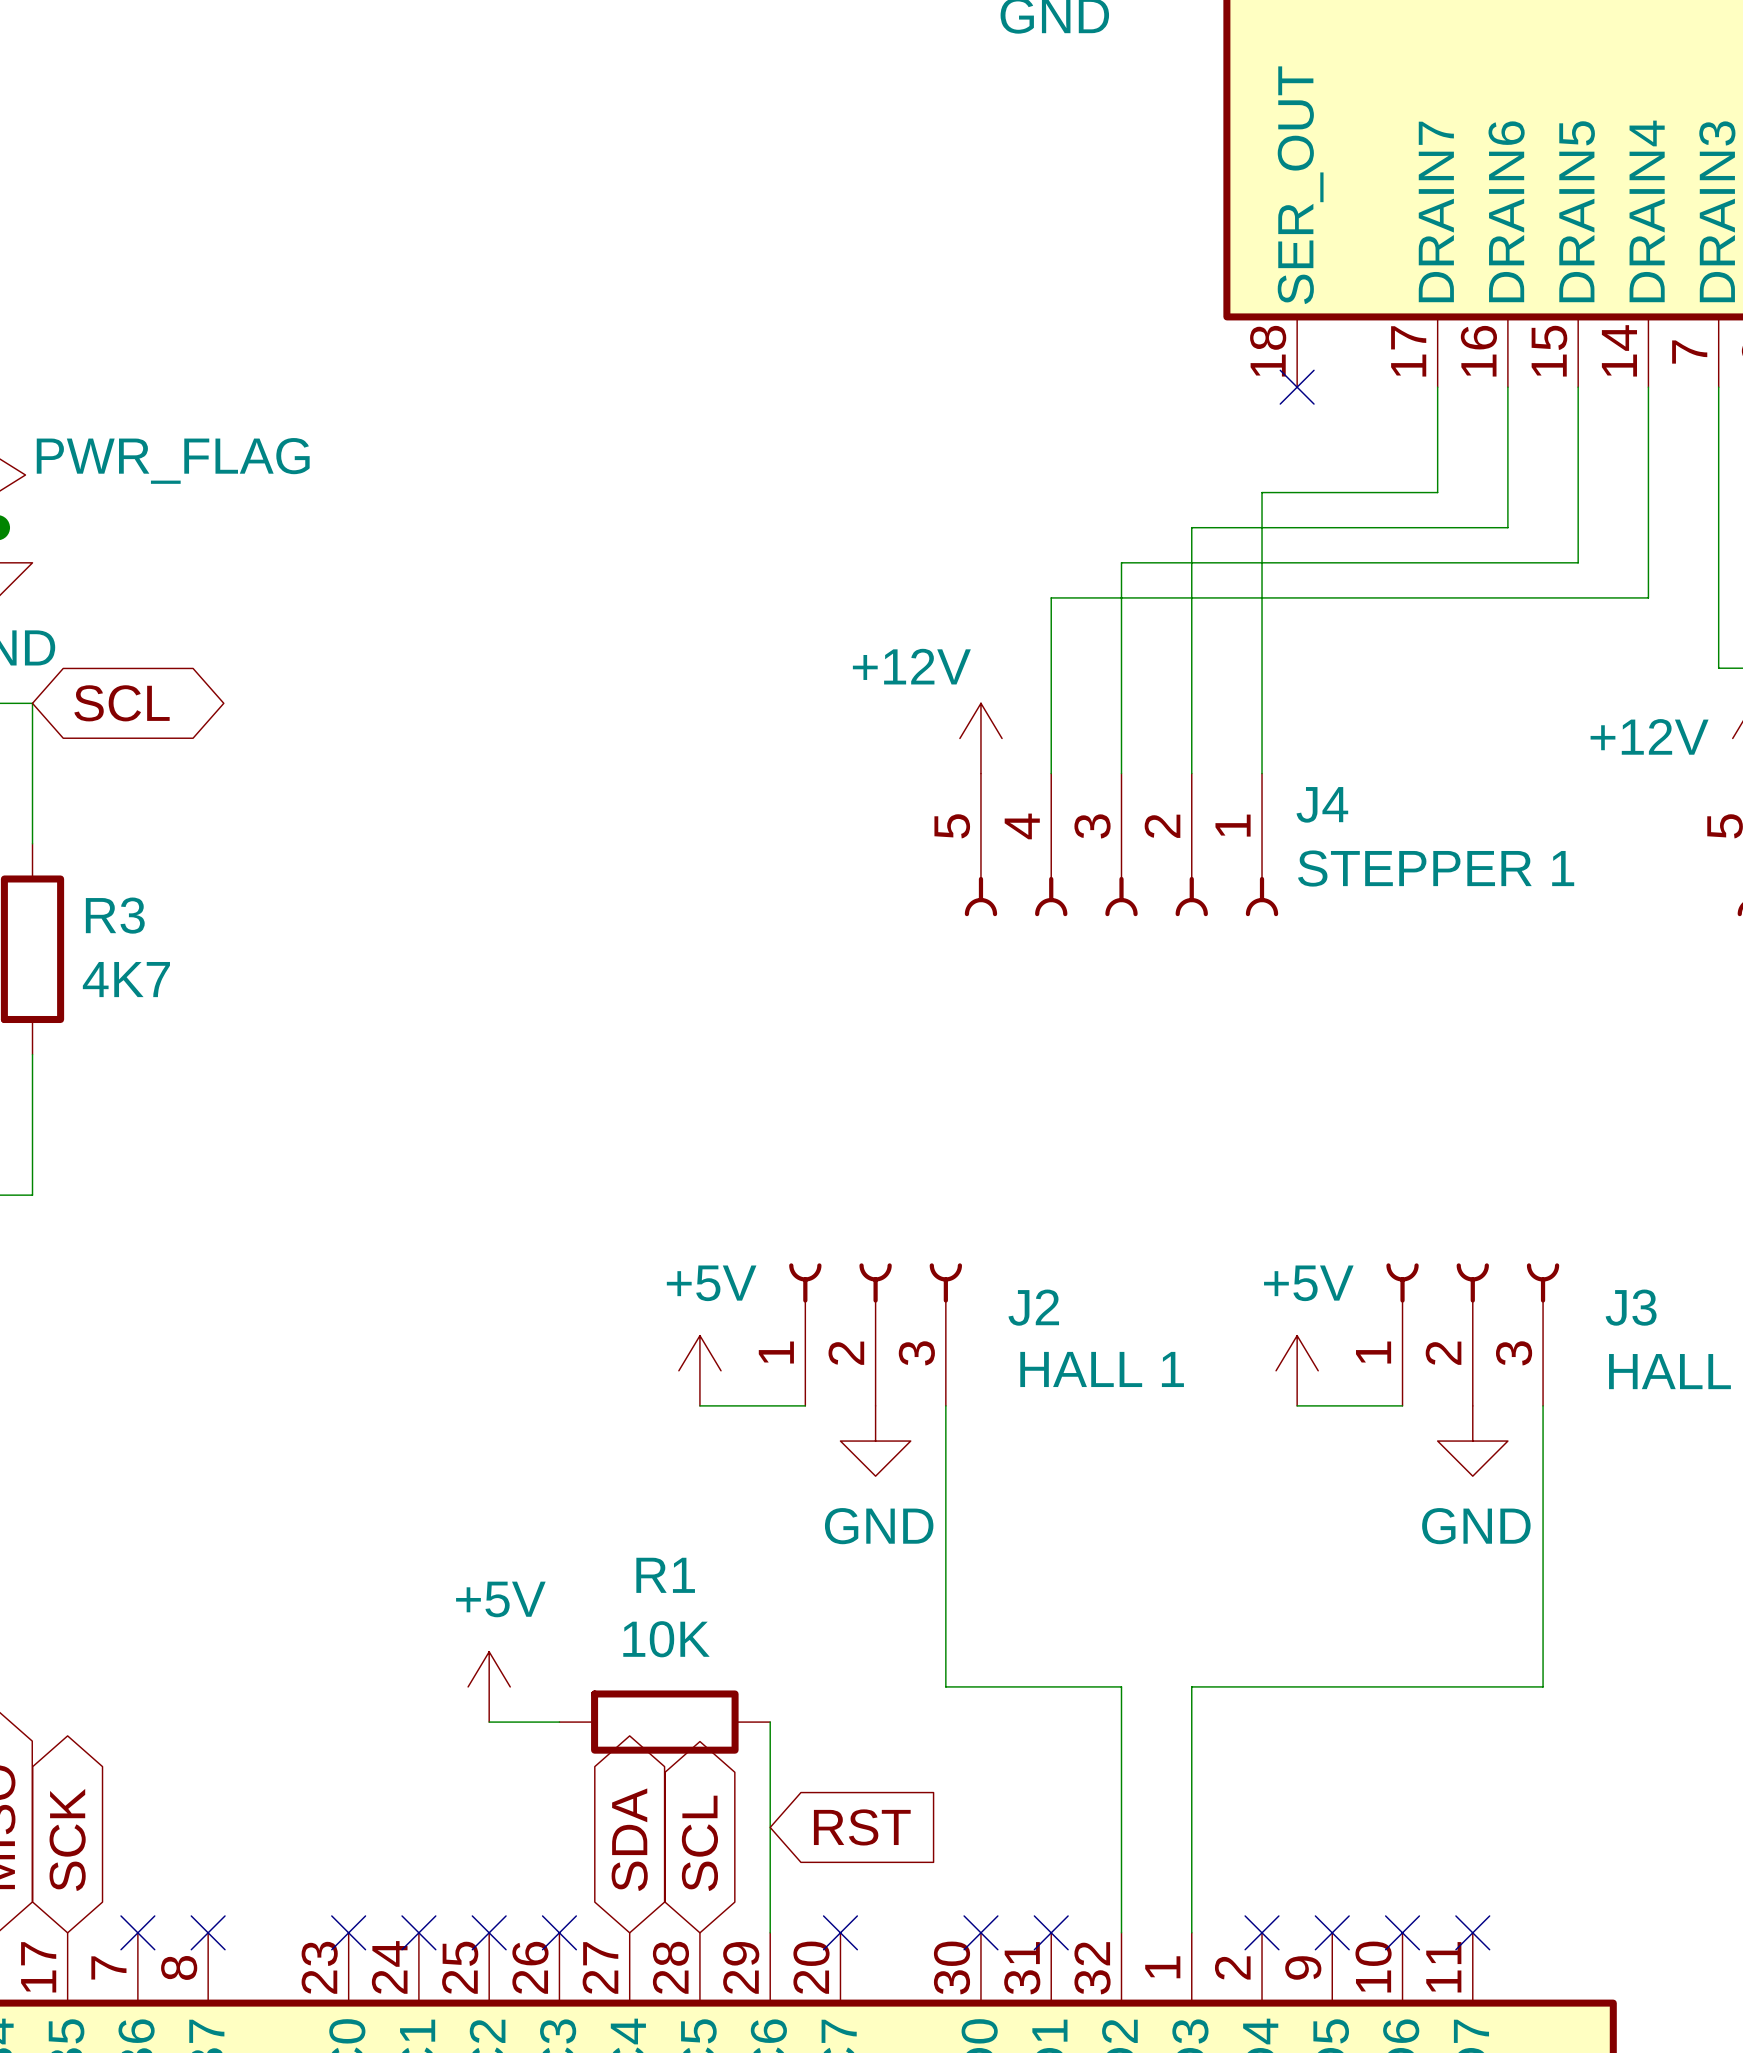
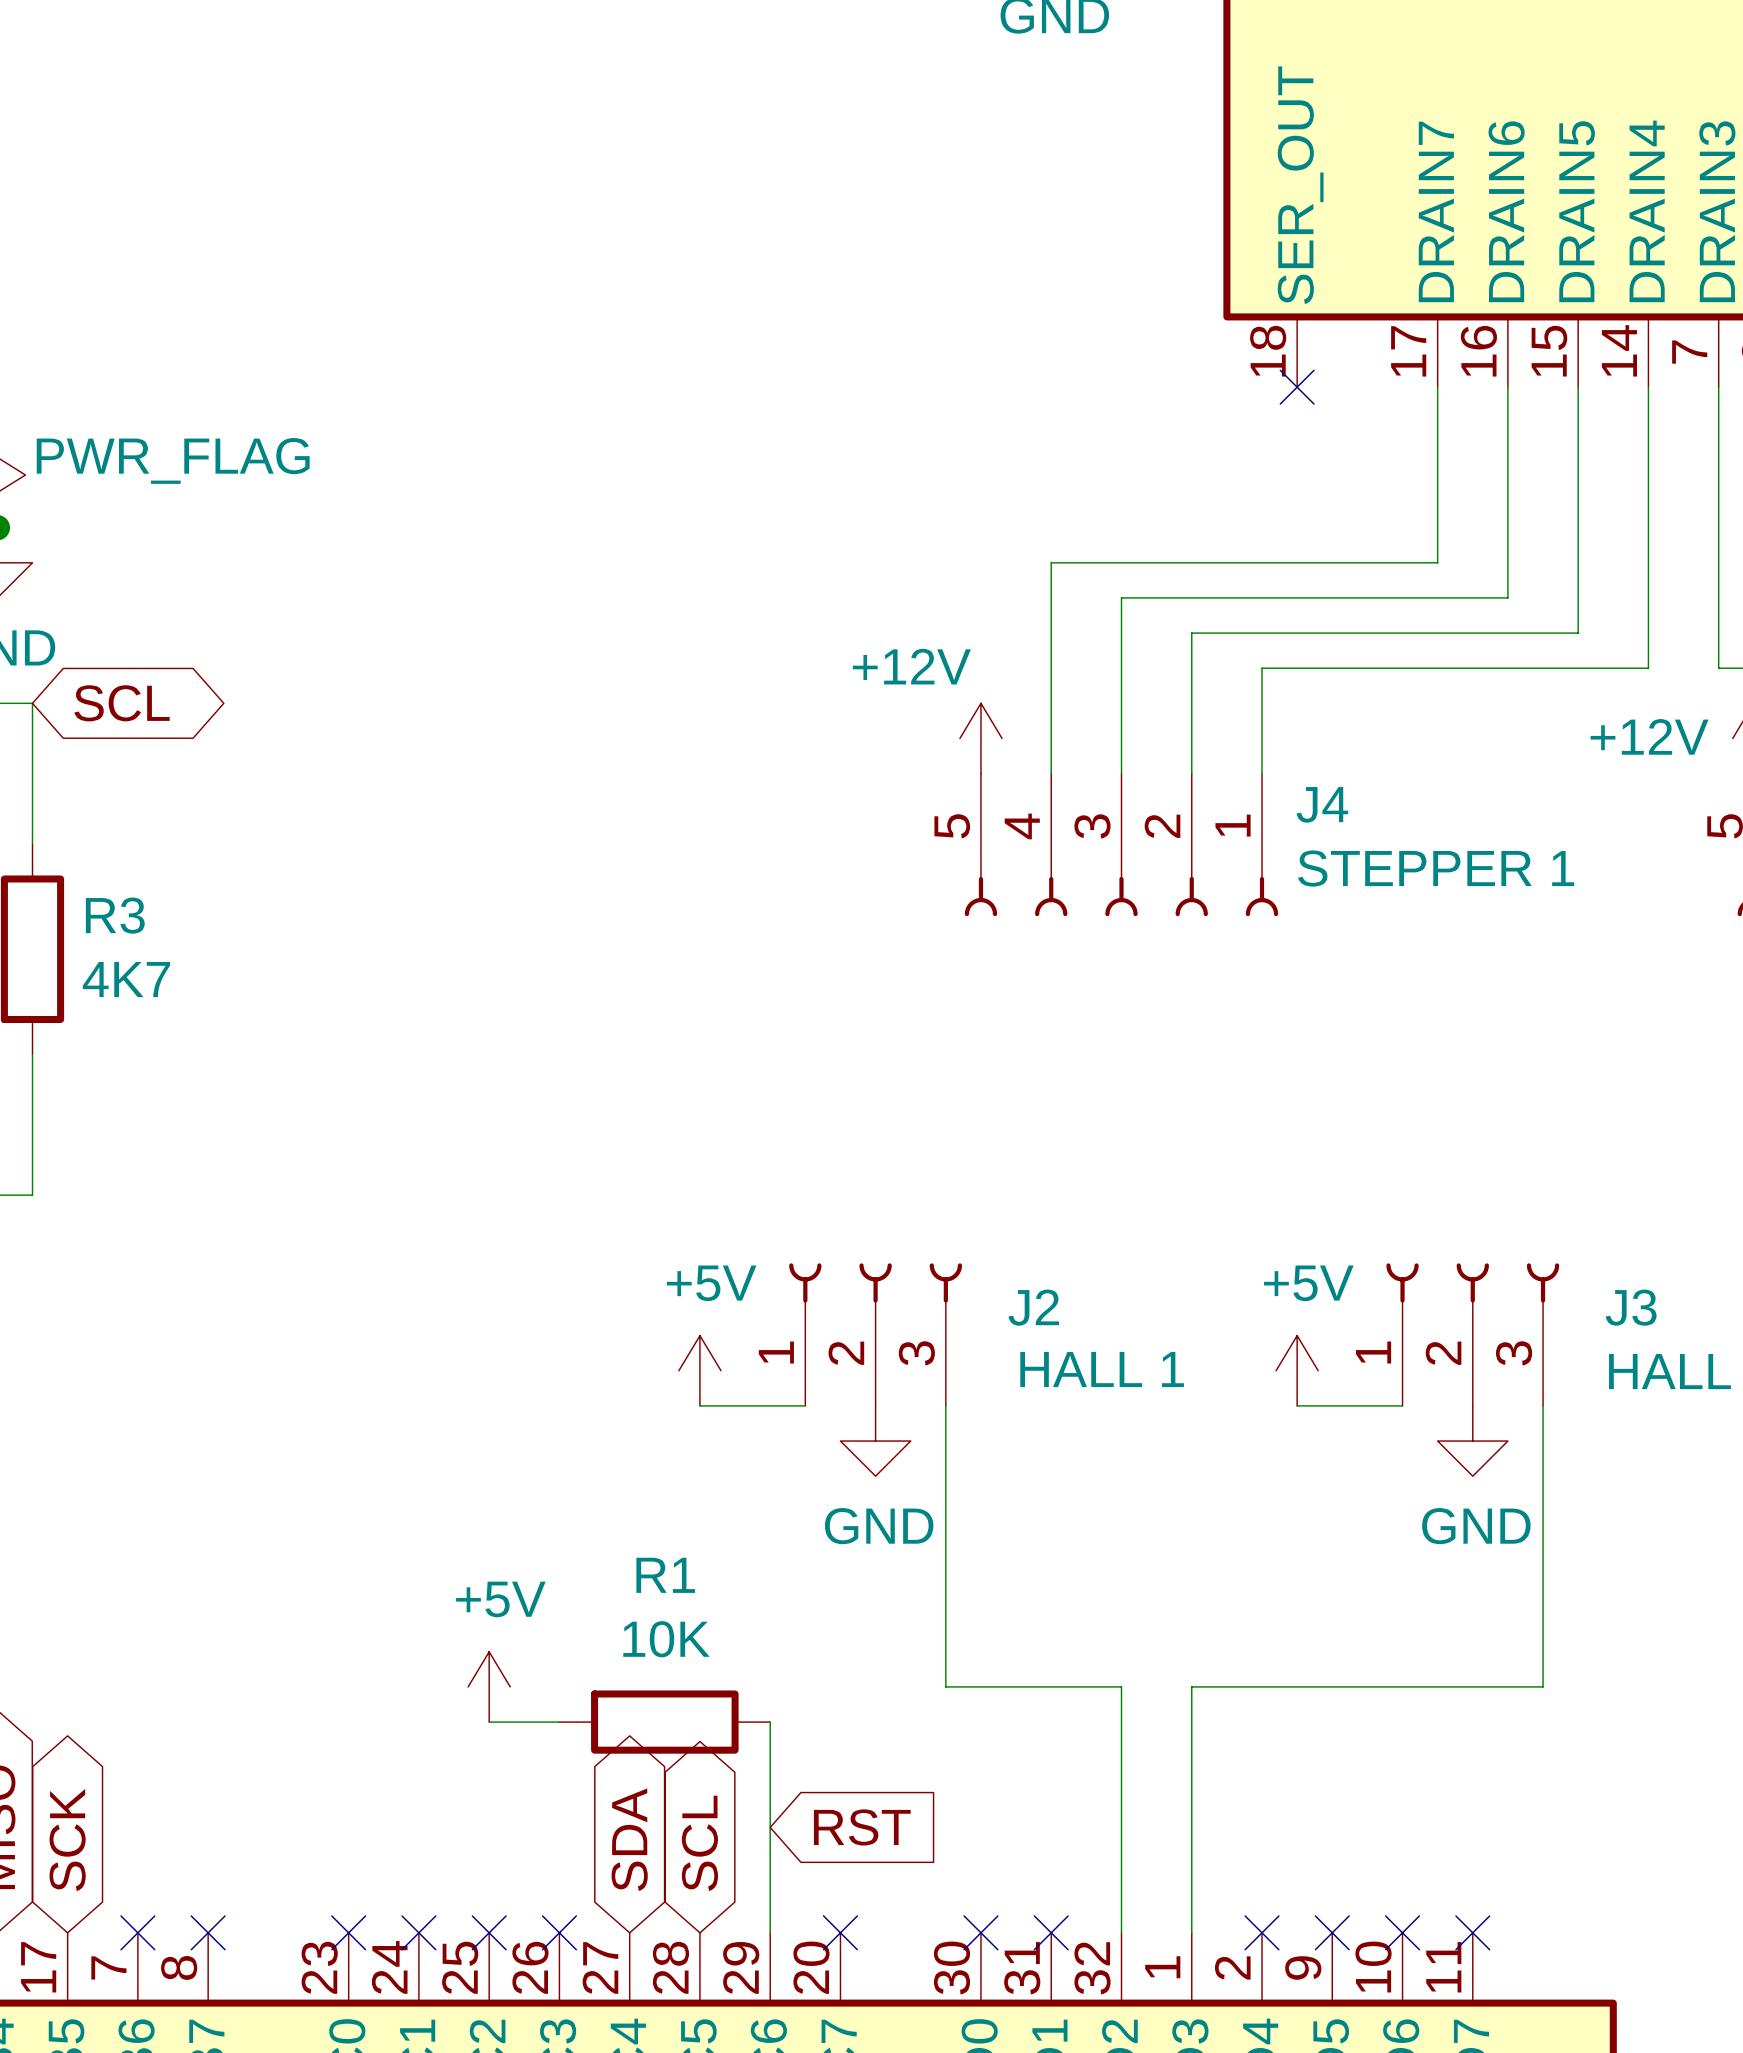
wire: (1437, 492) (1262, 492) (1262, 668) -> (1648, 597) (1648, 668) (1262, 668)
wire: (1507, 527) (1191, 527) (1191, 633) -> (1578, 562) (1578, 633) (1191, 633)
wire: (1121, 562) (1121, 597) (1051, 597) -> (1121, 562) (1051, 562) (1051, 597)
wire: (1437, 562) (1578, 562) -> (1437, 562) (1437, 492)
wire: (1507, 597) (1648, 597) -> (1507, 597) (1507, 527)

